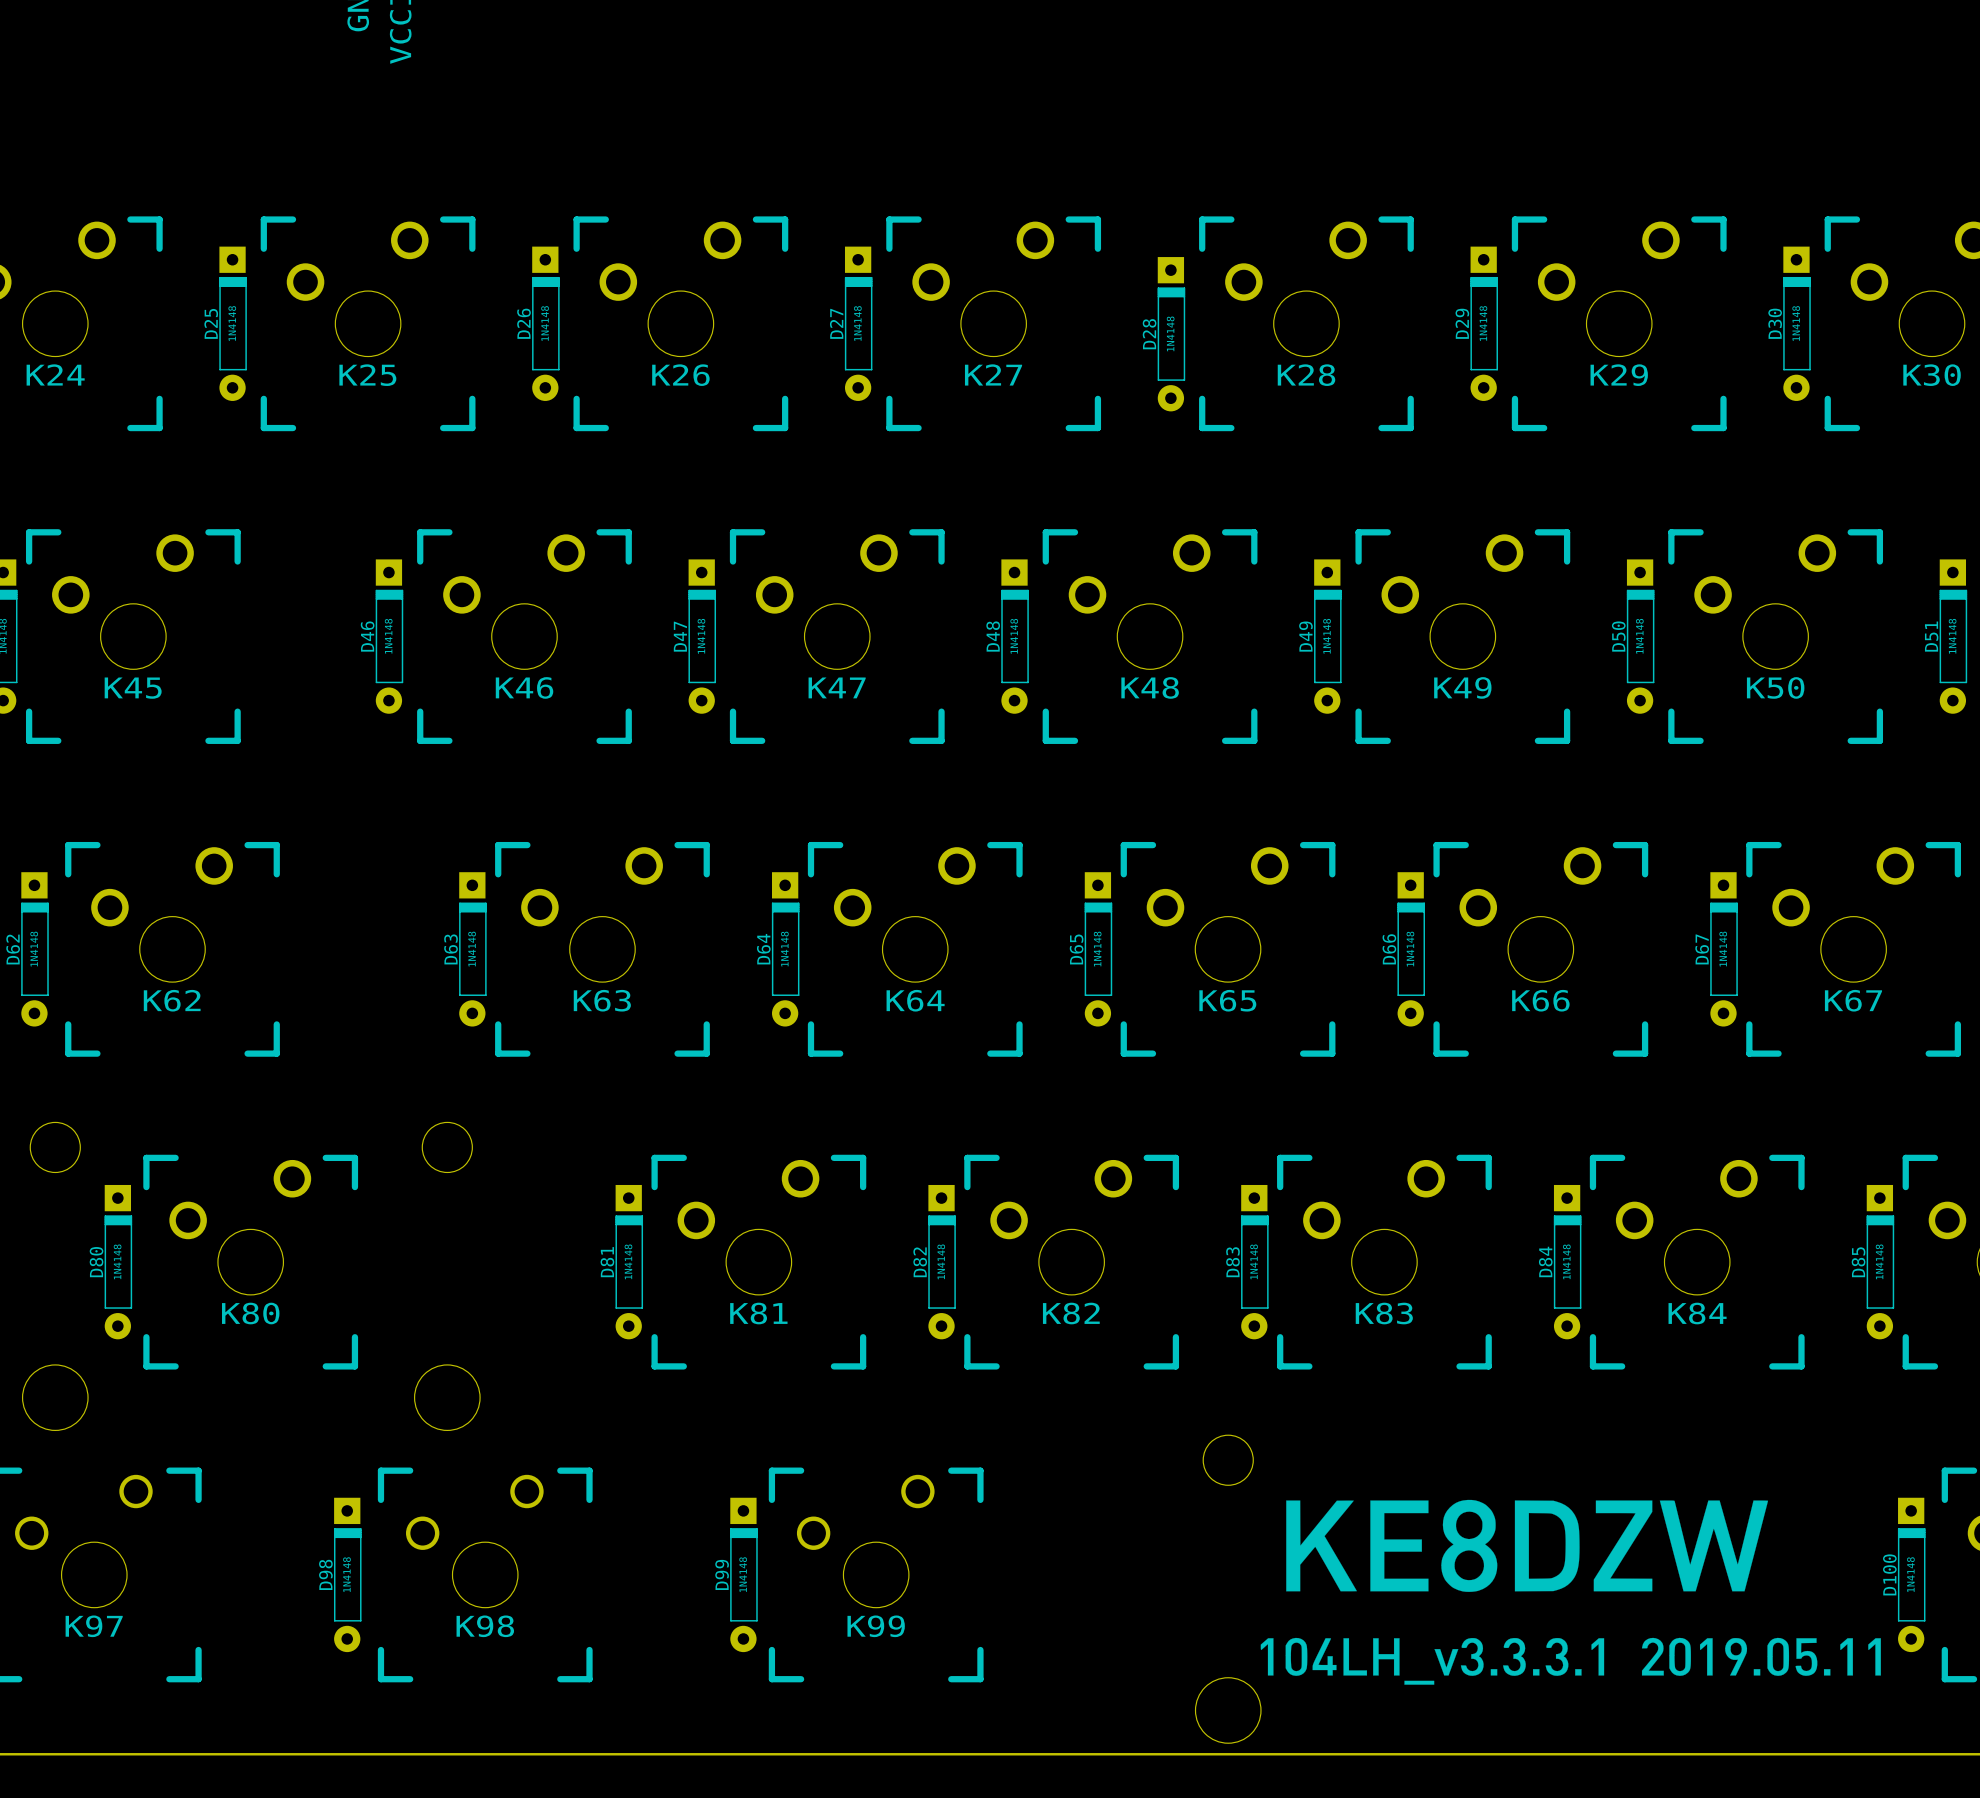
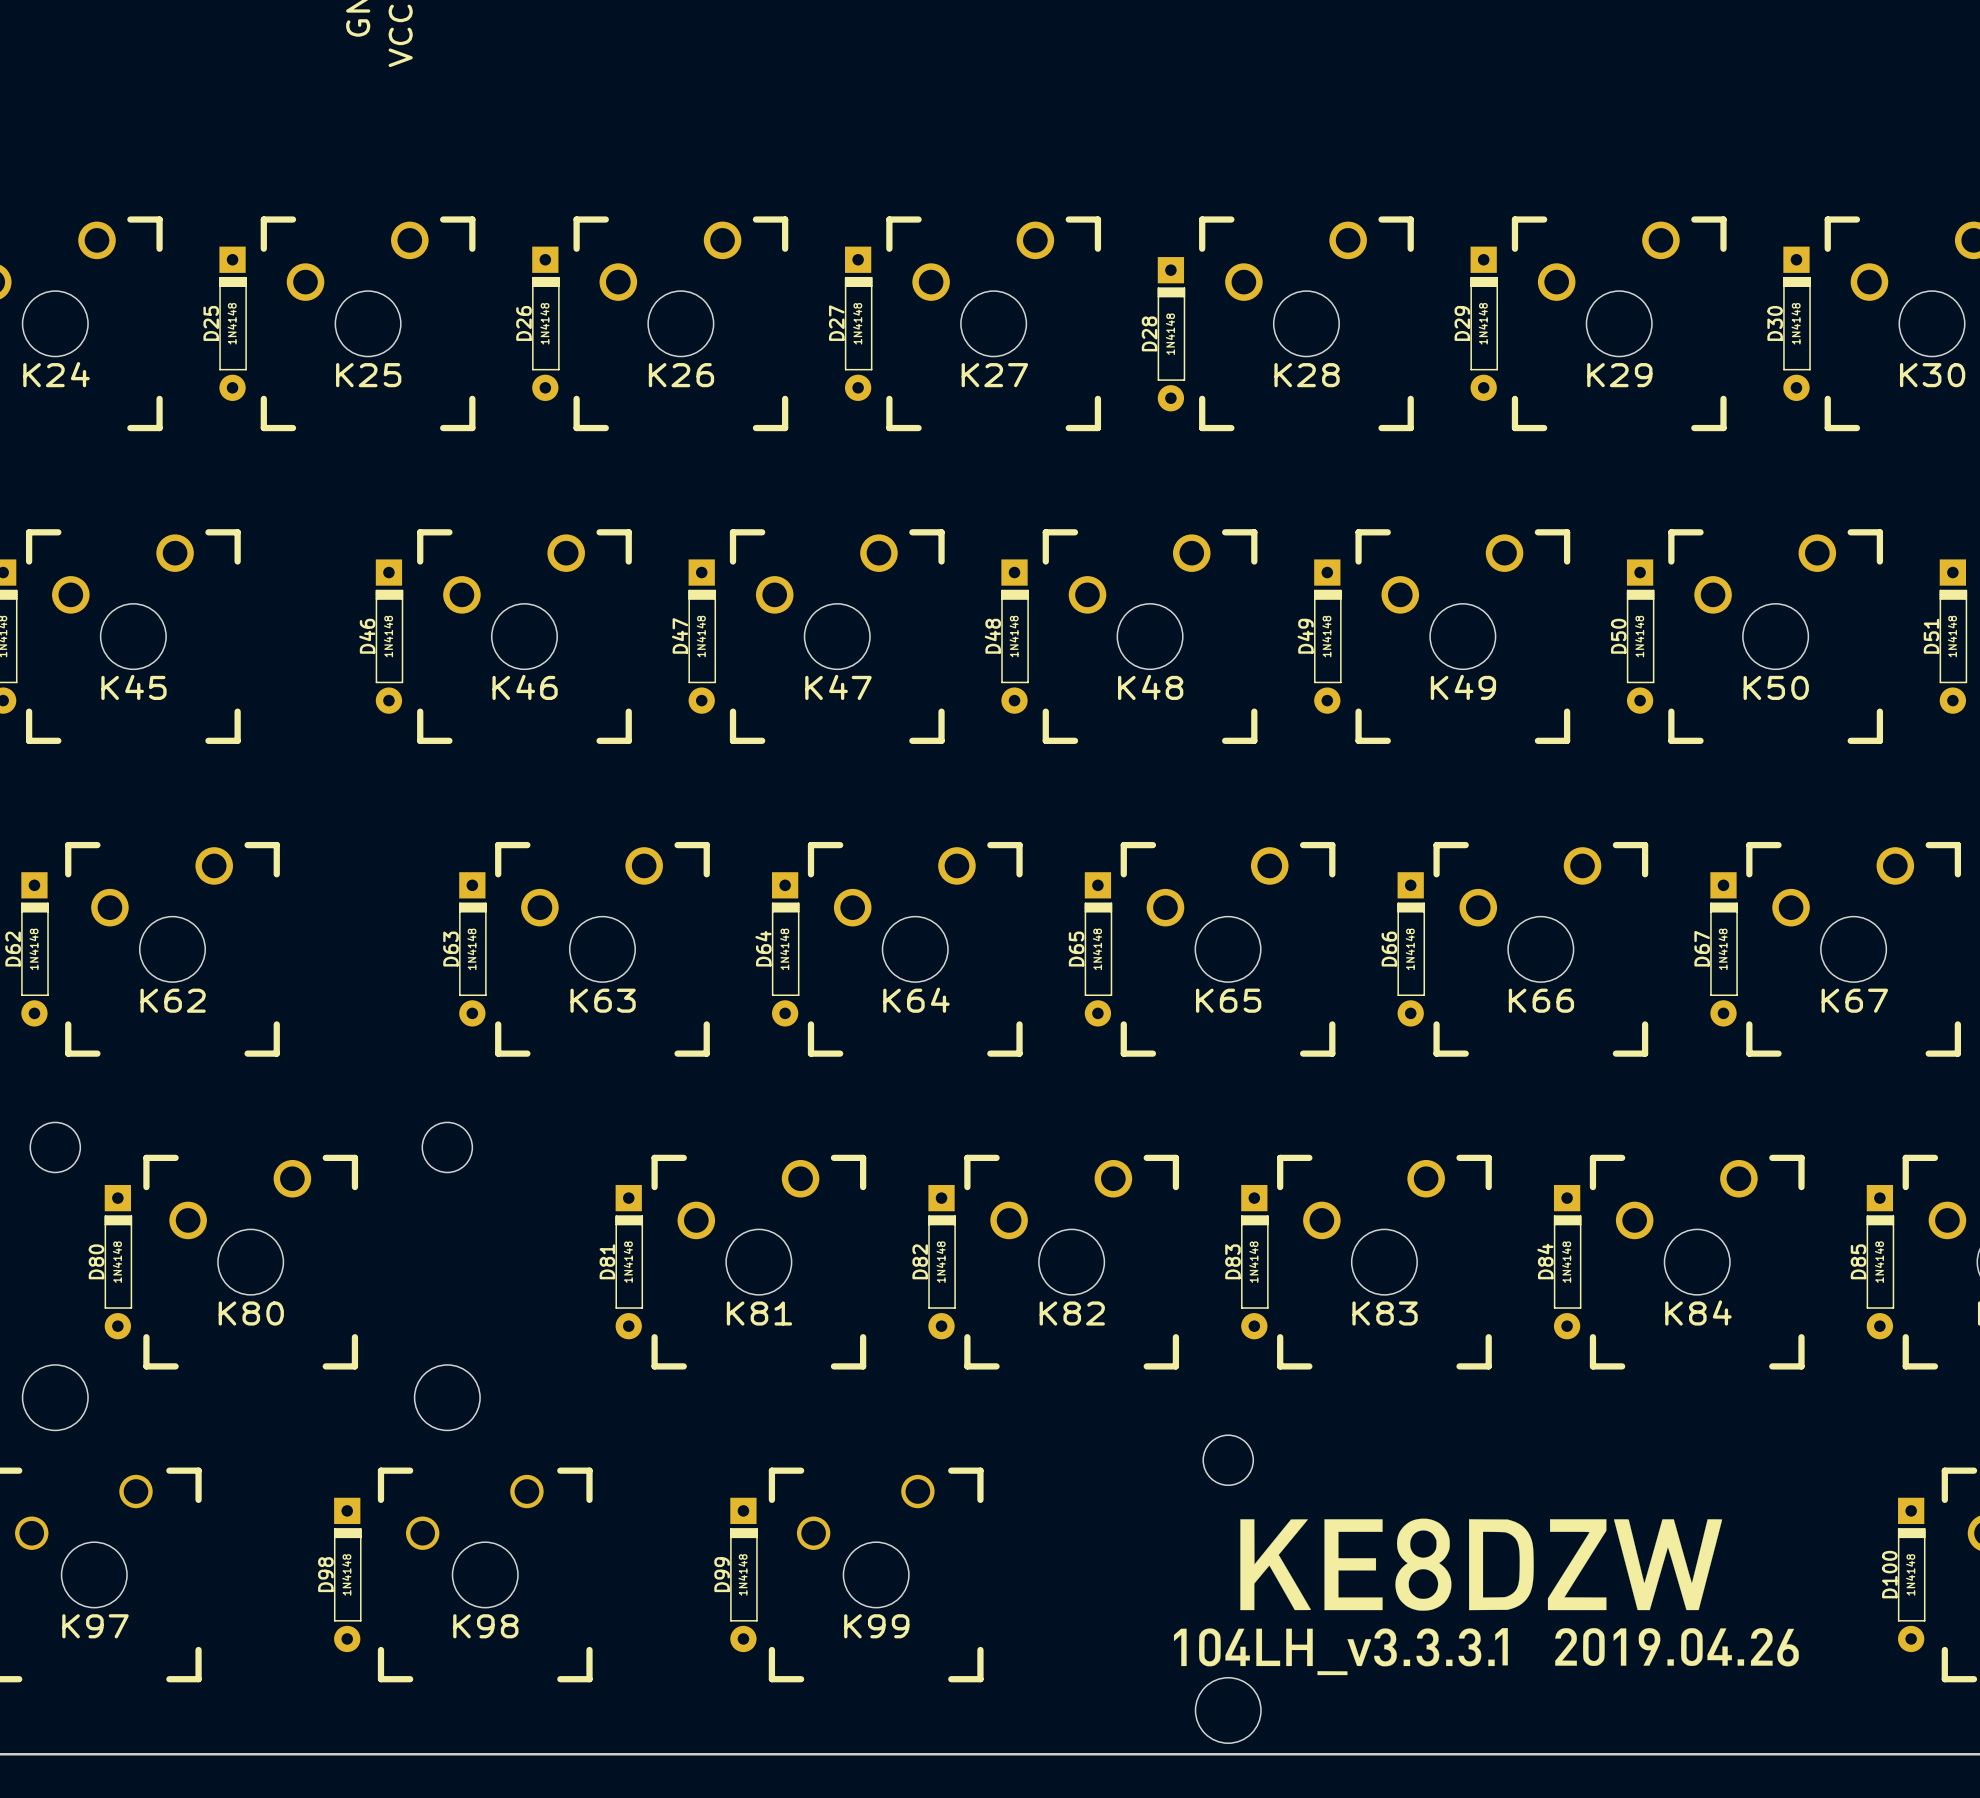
drawing: [1286, 1499, 1769, 1592] -> none
drawing: none -> [1173, 1518, 1799, 1676]
drawing: [1260, 1637, 1881, 1685] -> none

